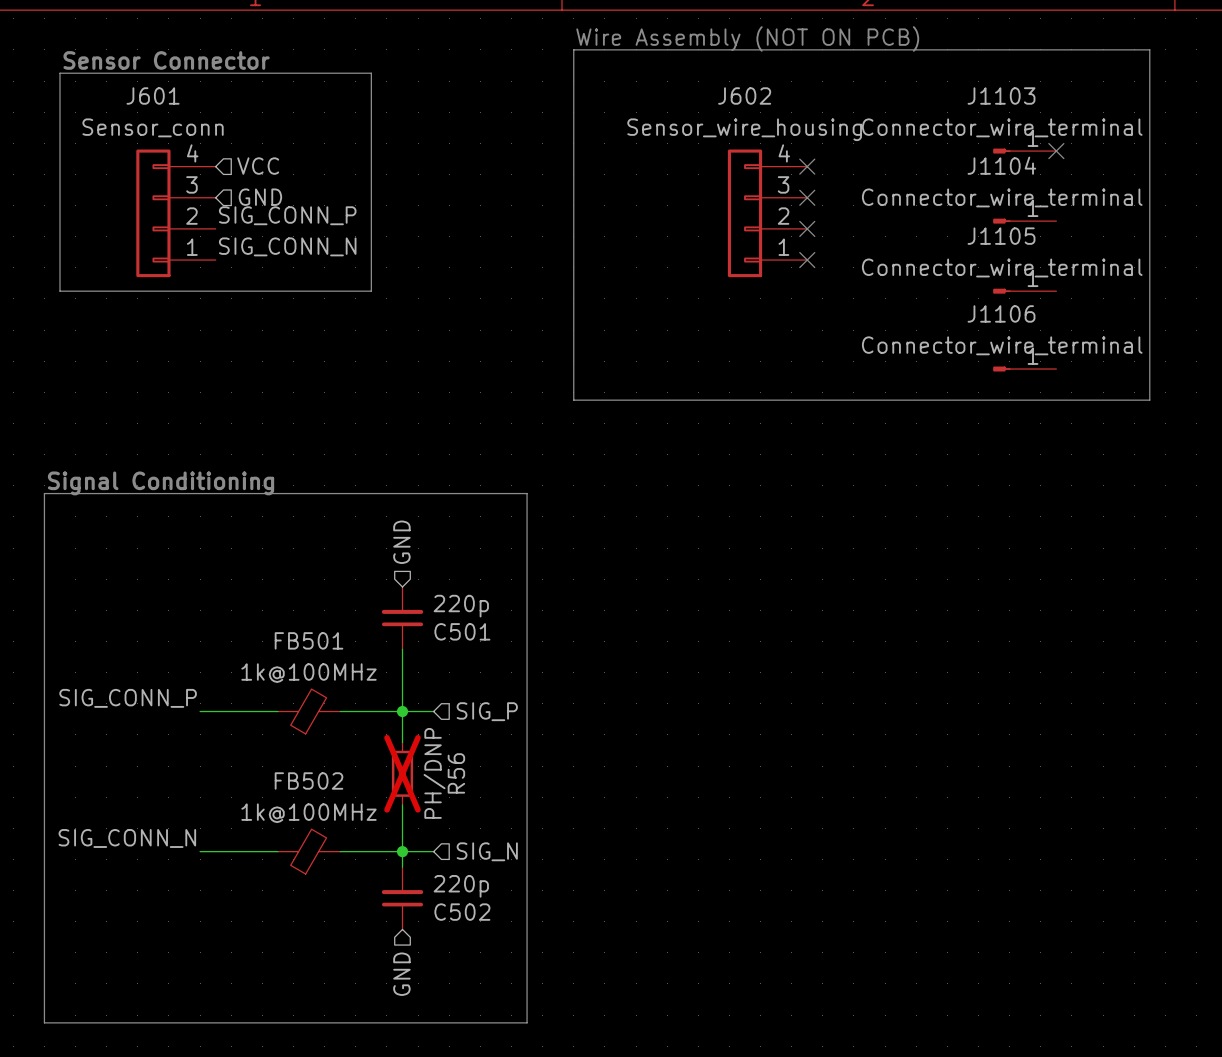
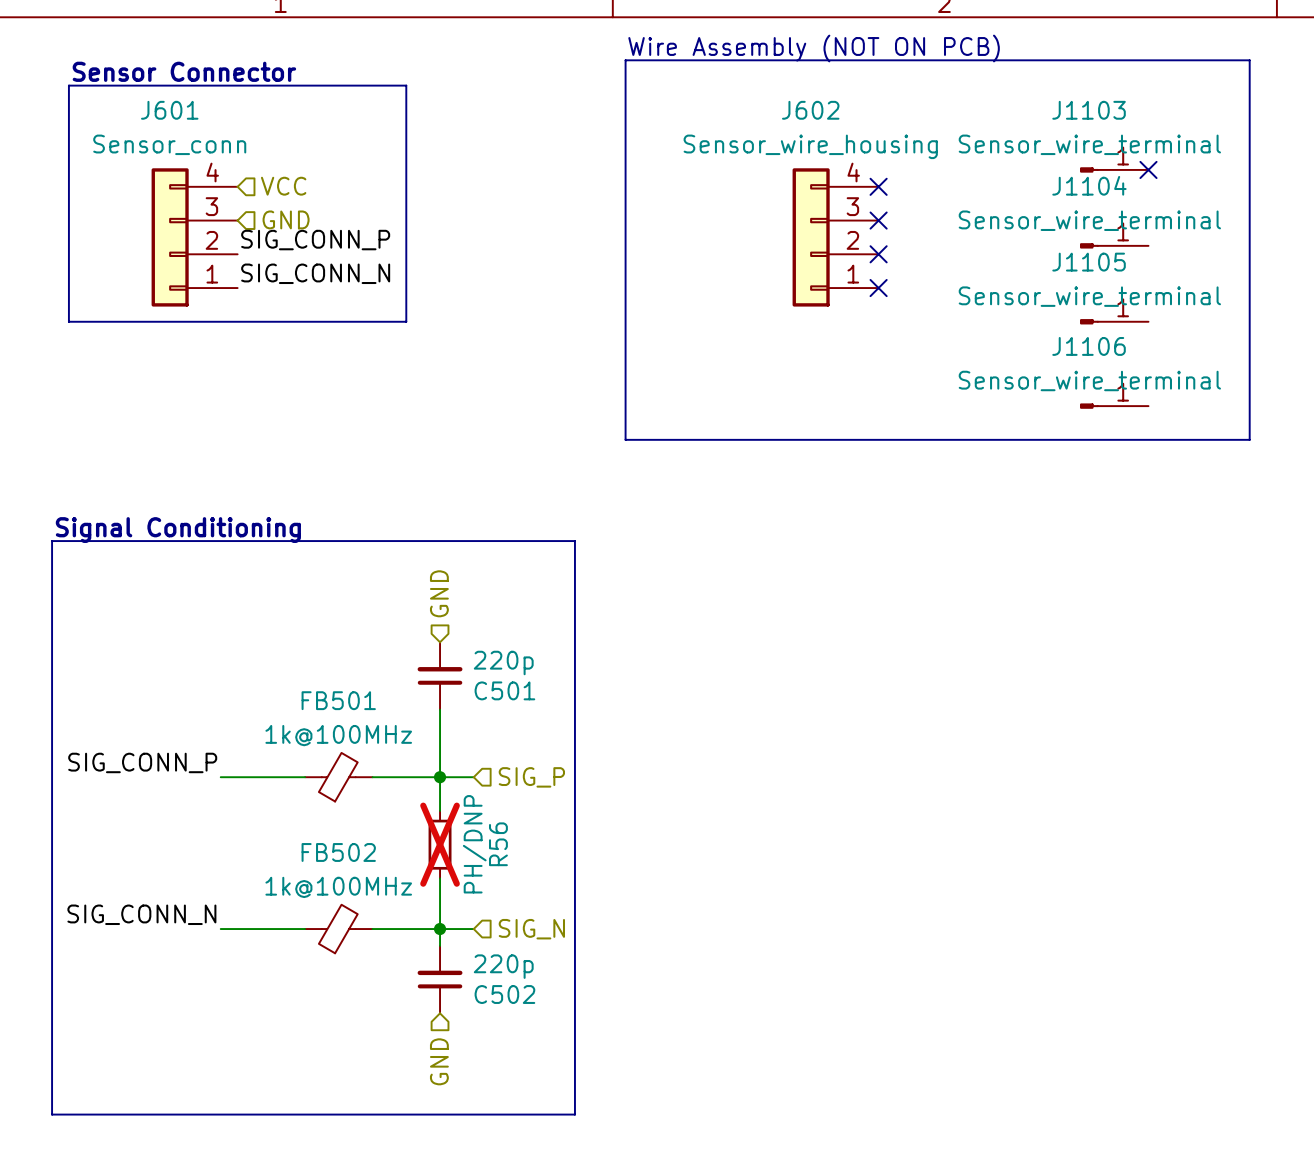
J1103 value: Connector_wire_terminal (1002, 127) -> Sensor_wire_terminal (1089, 144)
J1104 value: Connector_wire_terminal (1002, 197) -> Sensor_wire_terminal (1089, 220)
J1105 value: Connector_wire_terminal (1002, 267) -> Sensor_wire_terminal (1089, 296)
J1106 value: Connector_wire_terminal (1002, 345) -> Sensor_wire_terminal (1089, 380)

